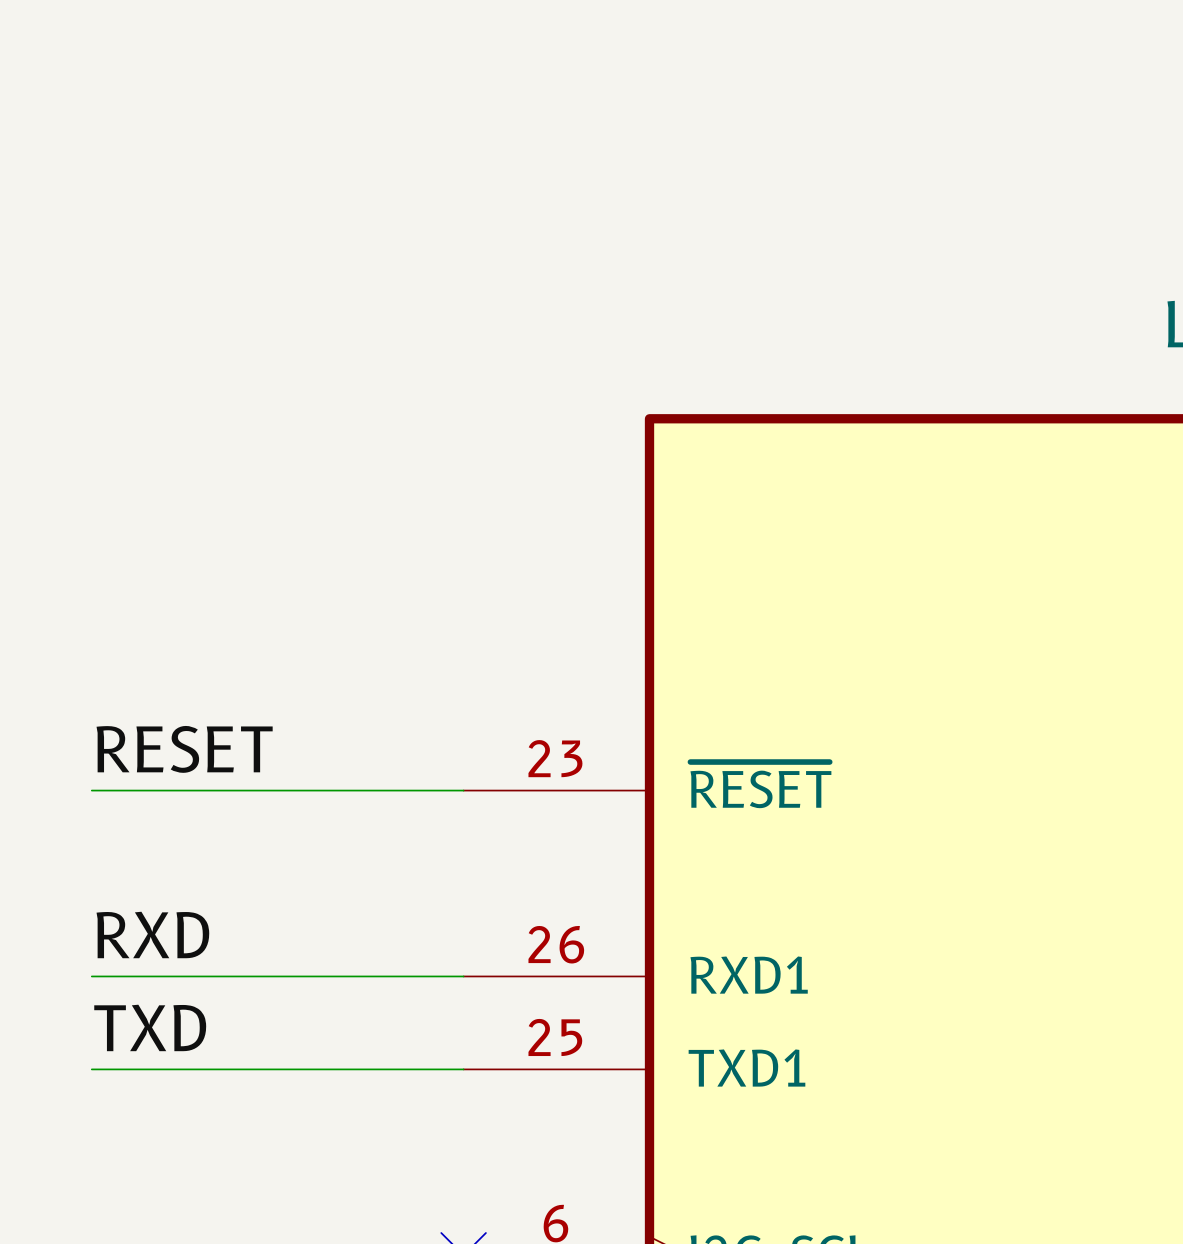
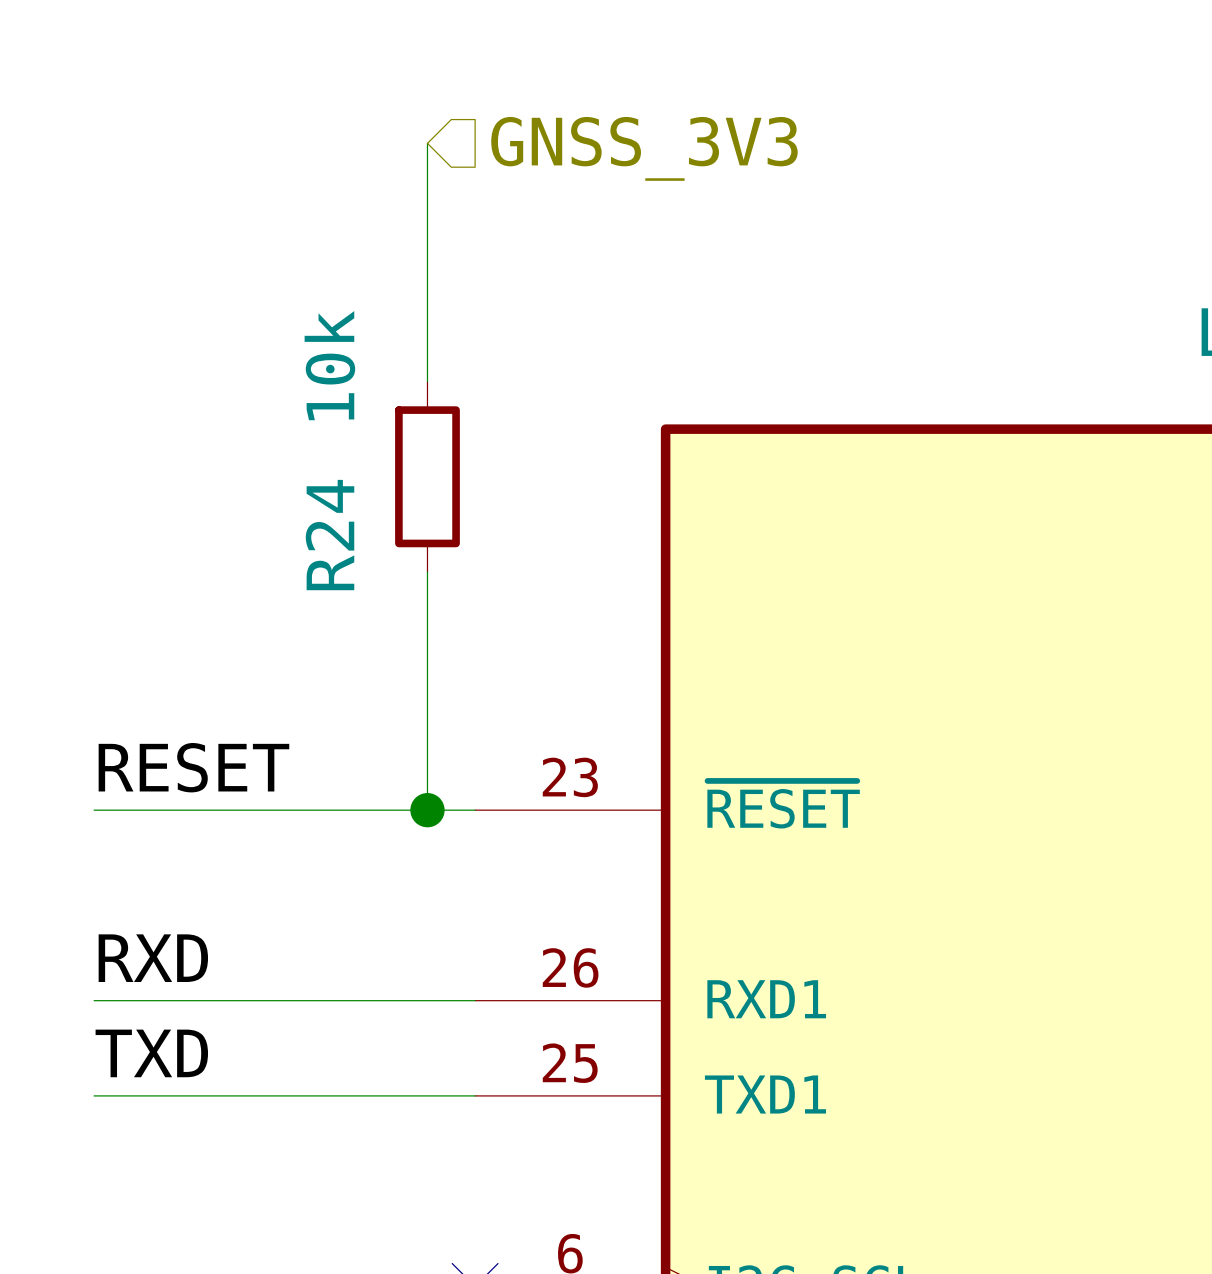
wire: none -> (427, 143) (427, 381)
hierarchical label: none -> GNSS_3V3 (644, 148)
R24: none -> 10k (427, 476)
wire: none -> (427, 572) (427, 810)
junction: none -> (427, 810)

